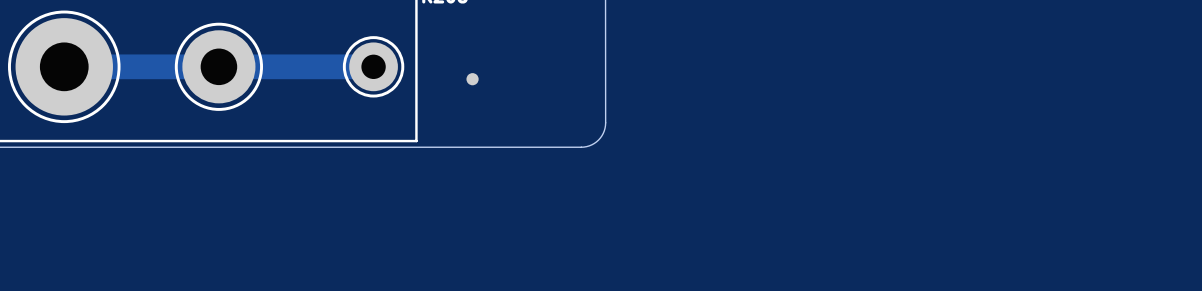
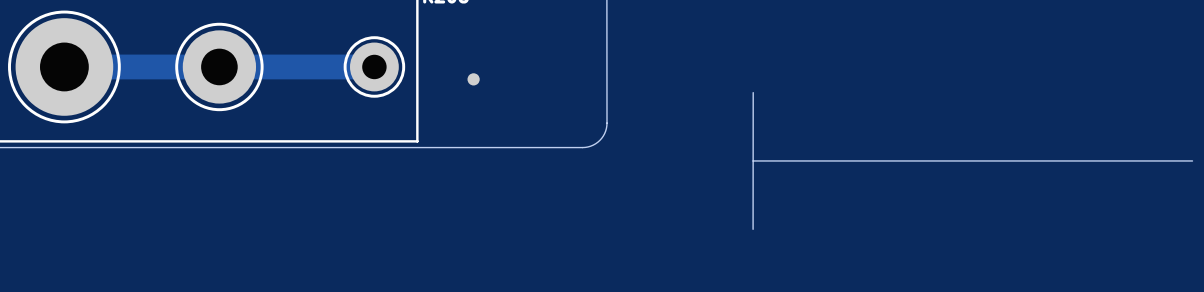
board edge: none -> (753, 92) (753, 229)
board edge: none -> (753, 160) (1192, 160)

